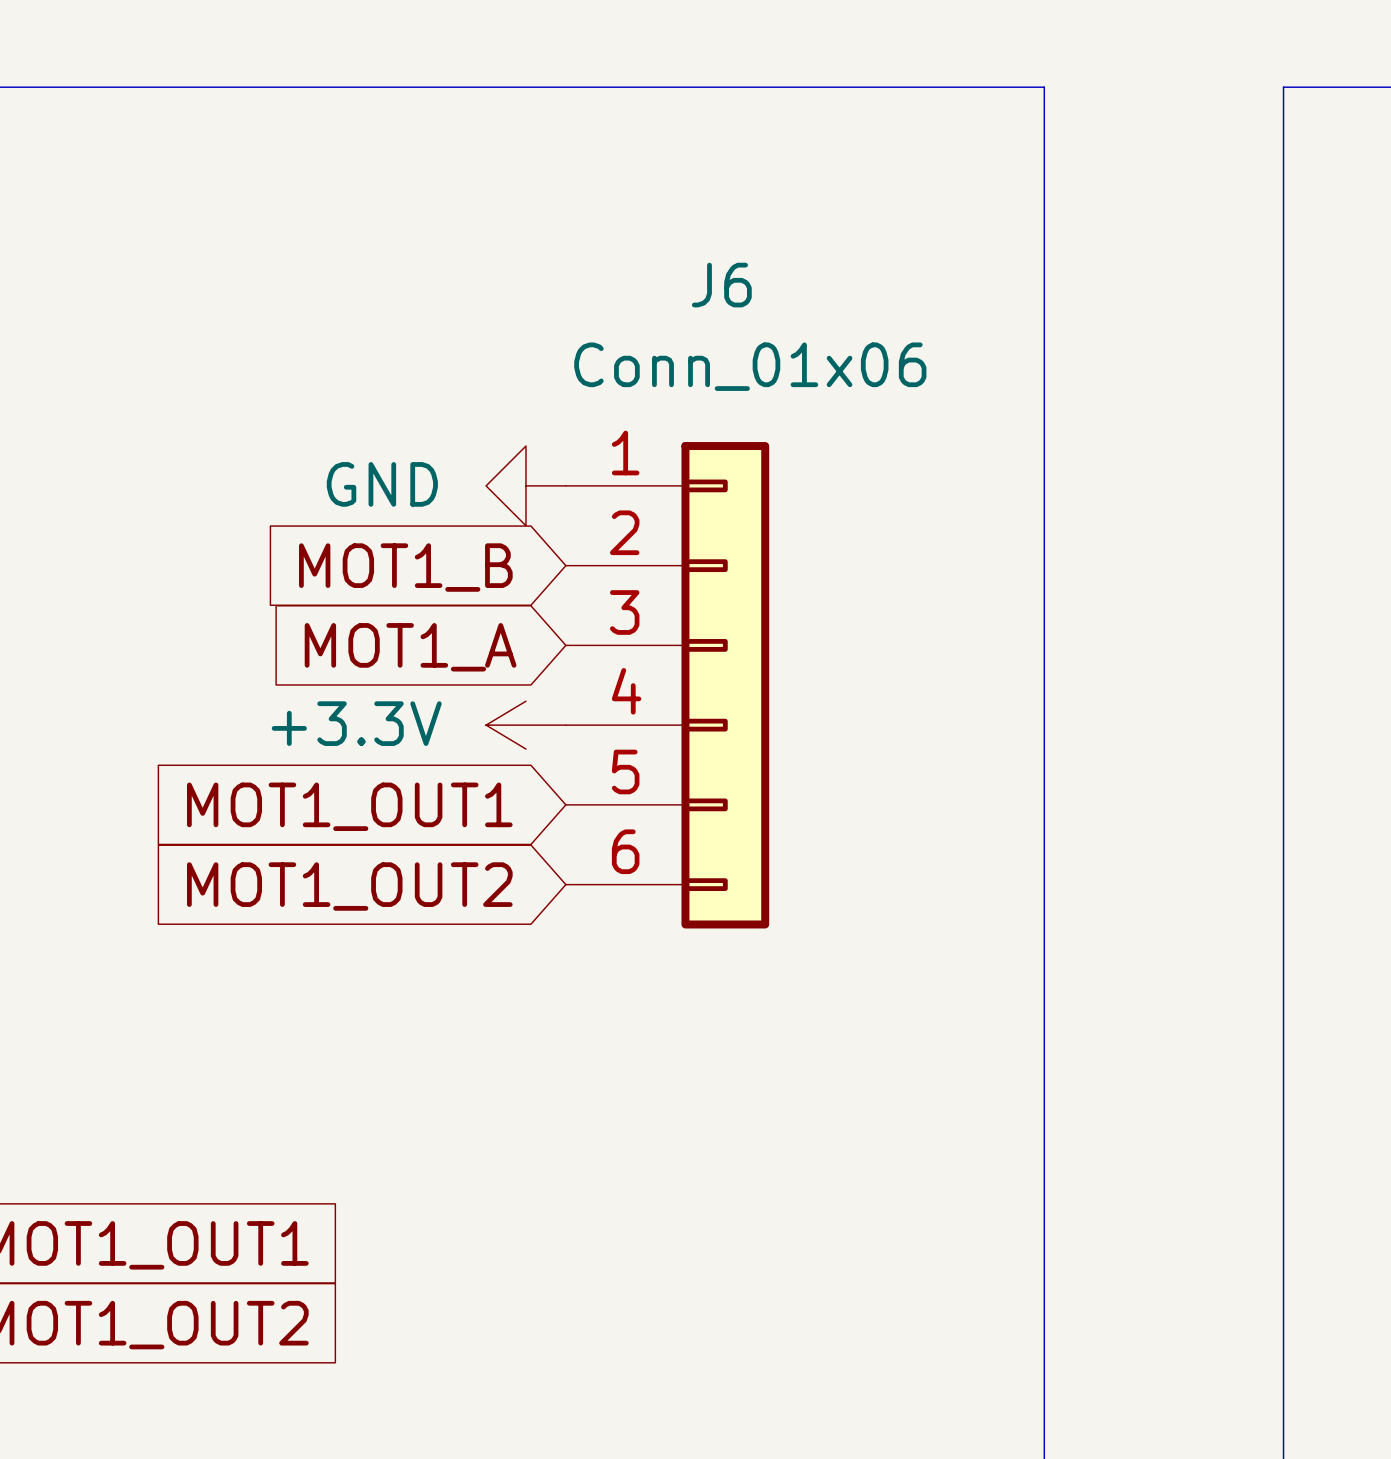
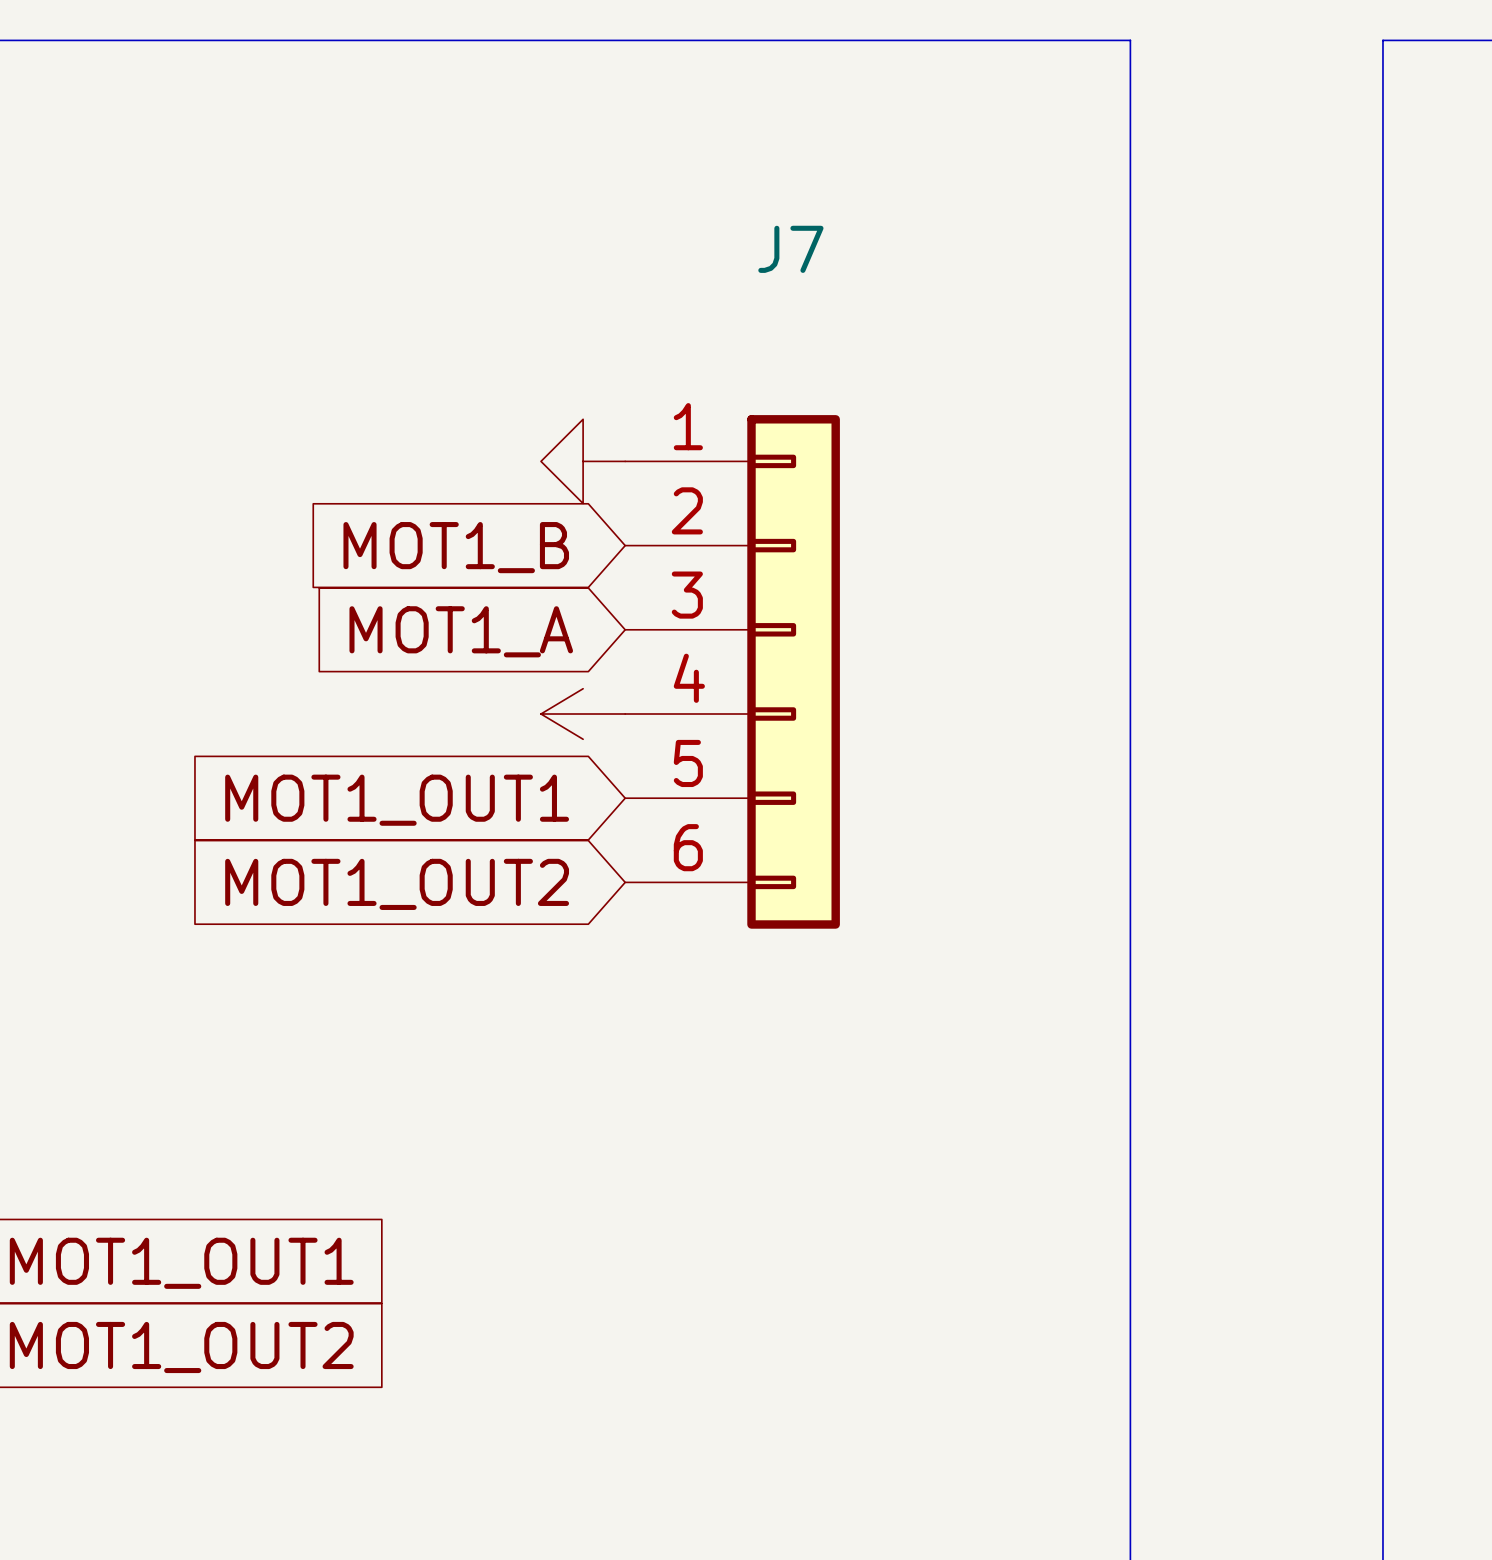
J6 name: J6 (721, 285) -> J7 (790, 249)
J6 value: Conn_01x06 (750, 366) -> none
power symbol text: GND (382, 484) -> none
power symbol text: +3.3V (356, 723) -> none

